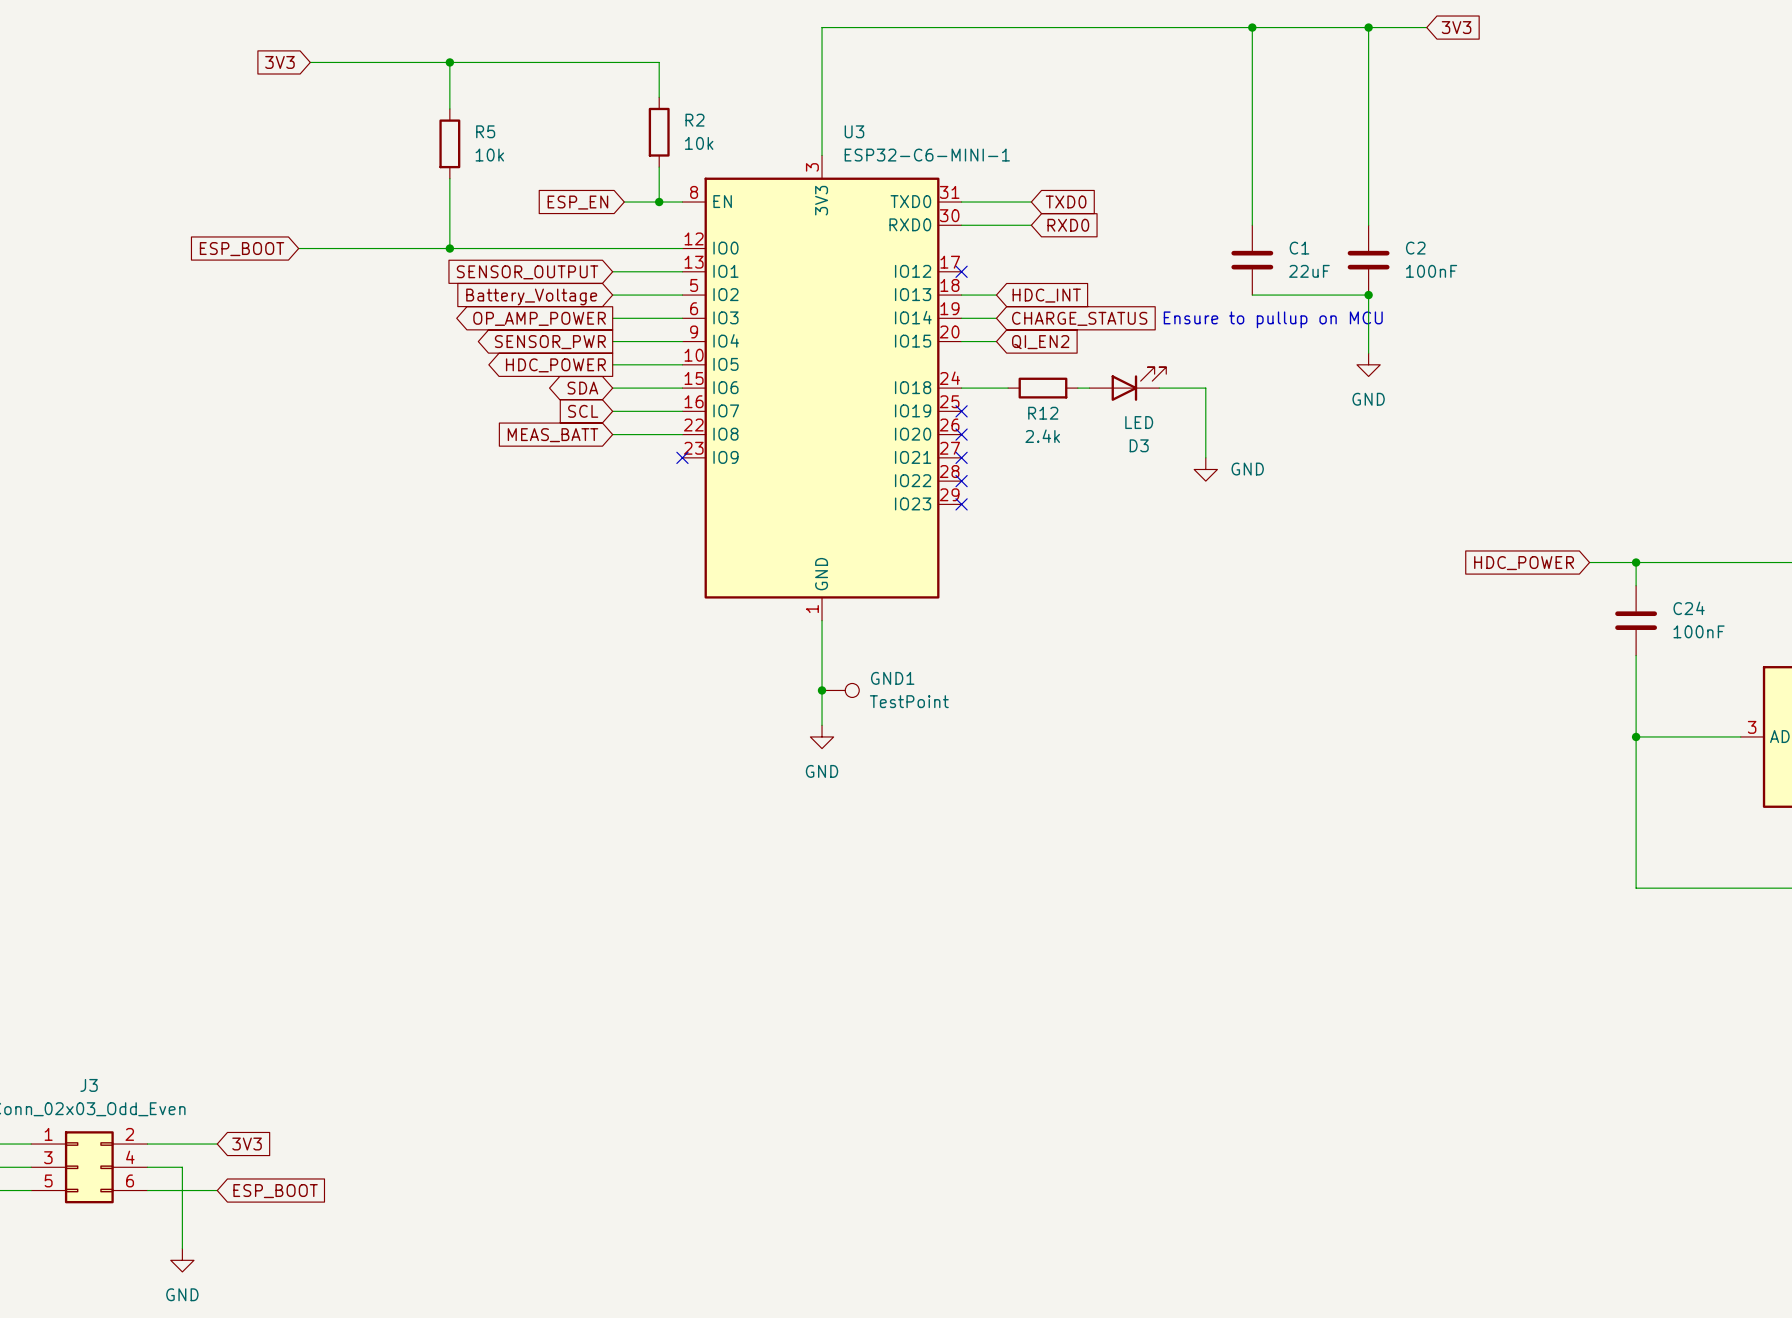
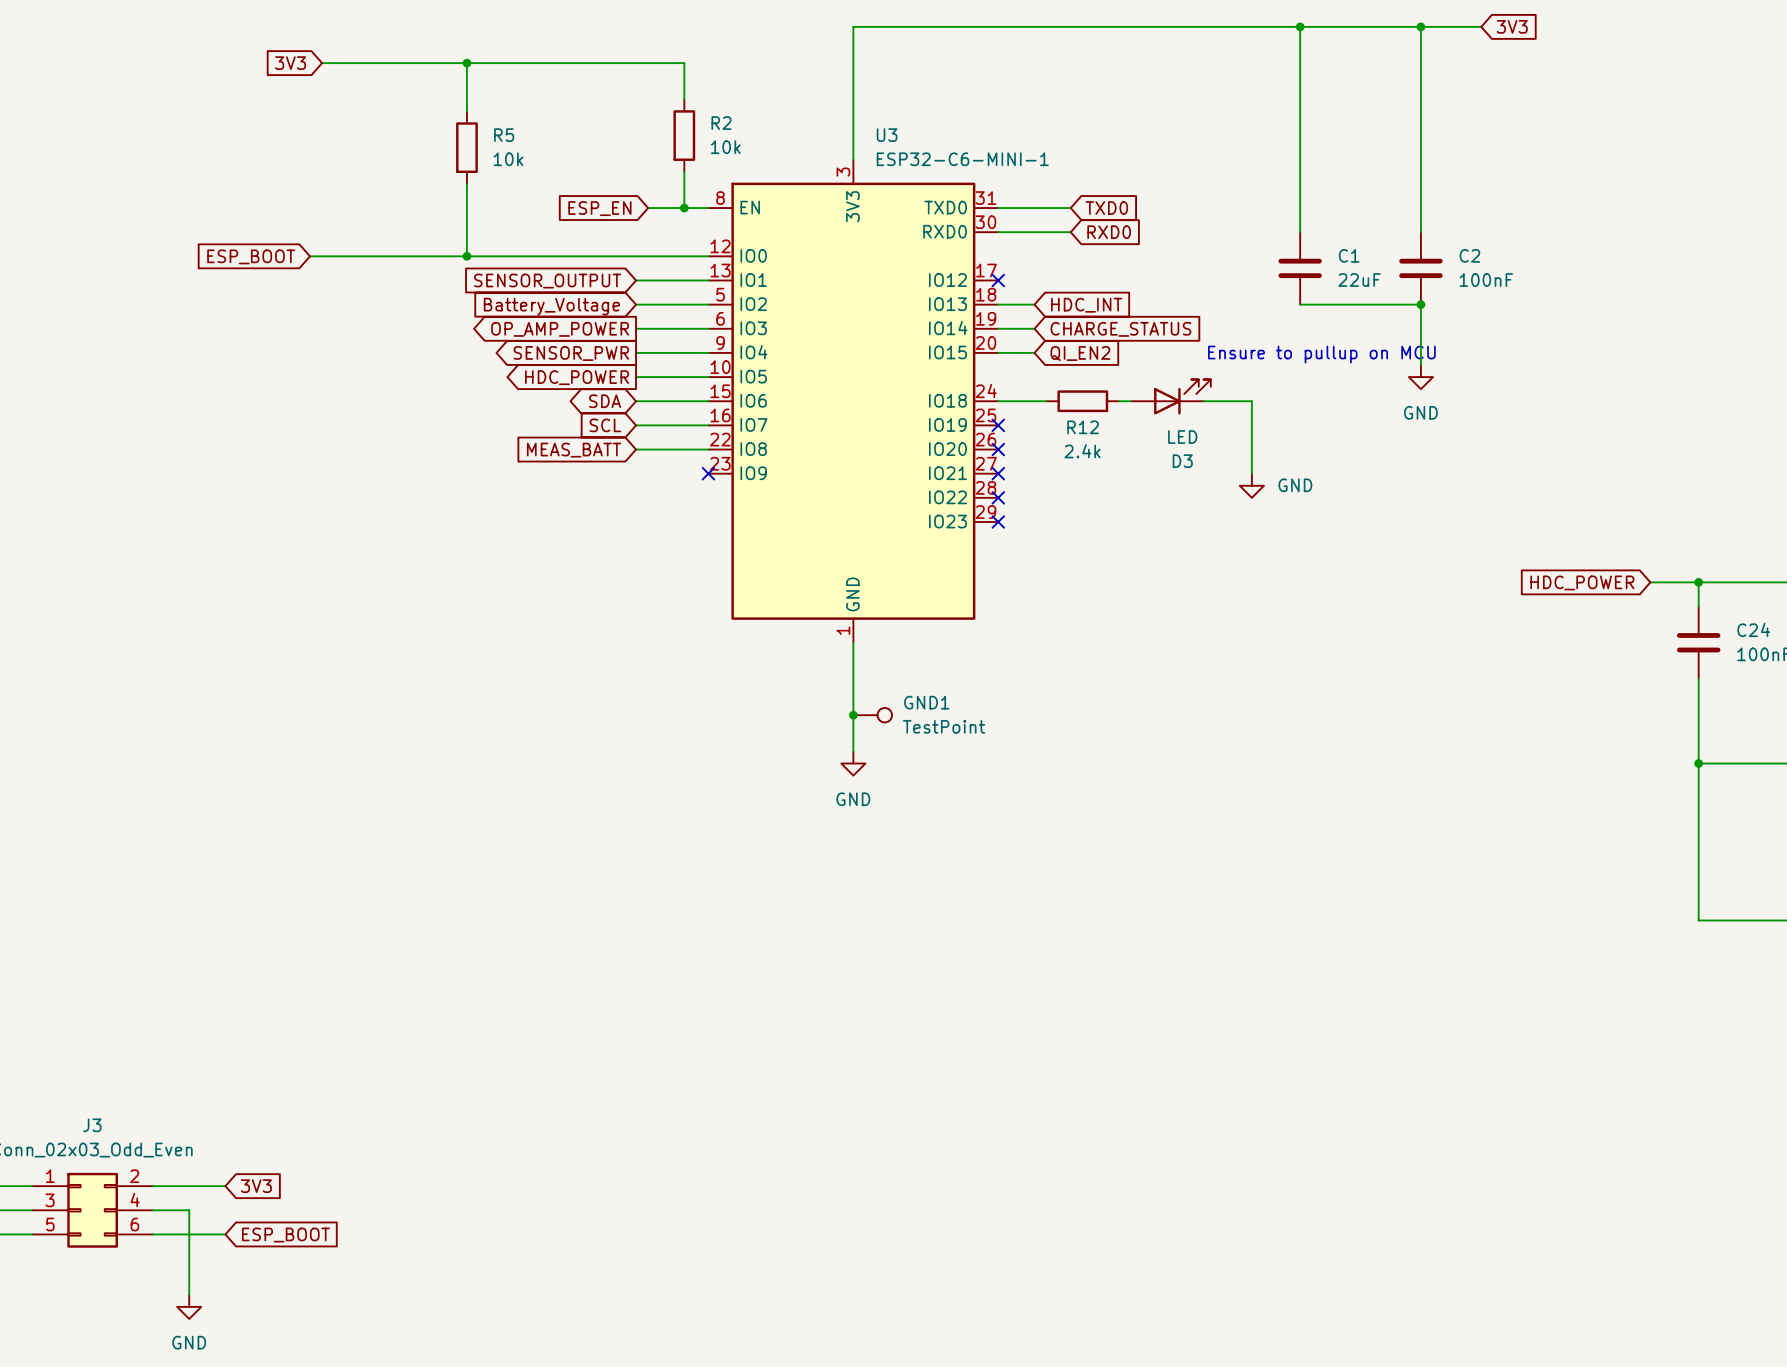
text position: Ensure to pullup on MCU (1273, 319) -> Ensure to pullup on MCU (1321, 354)

